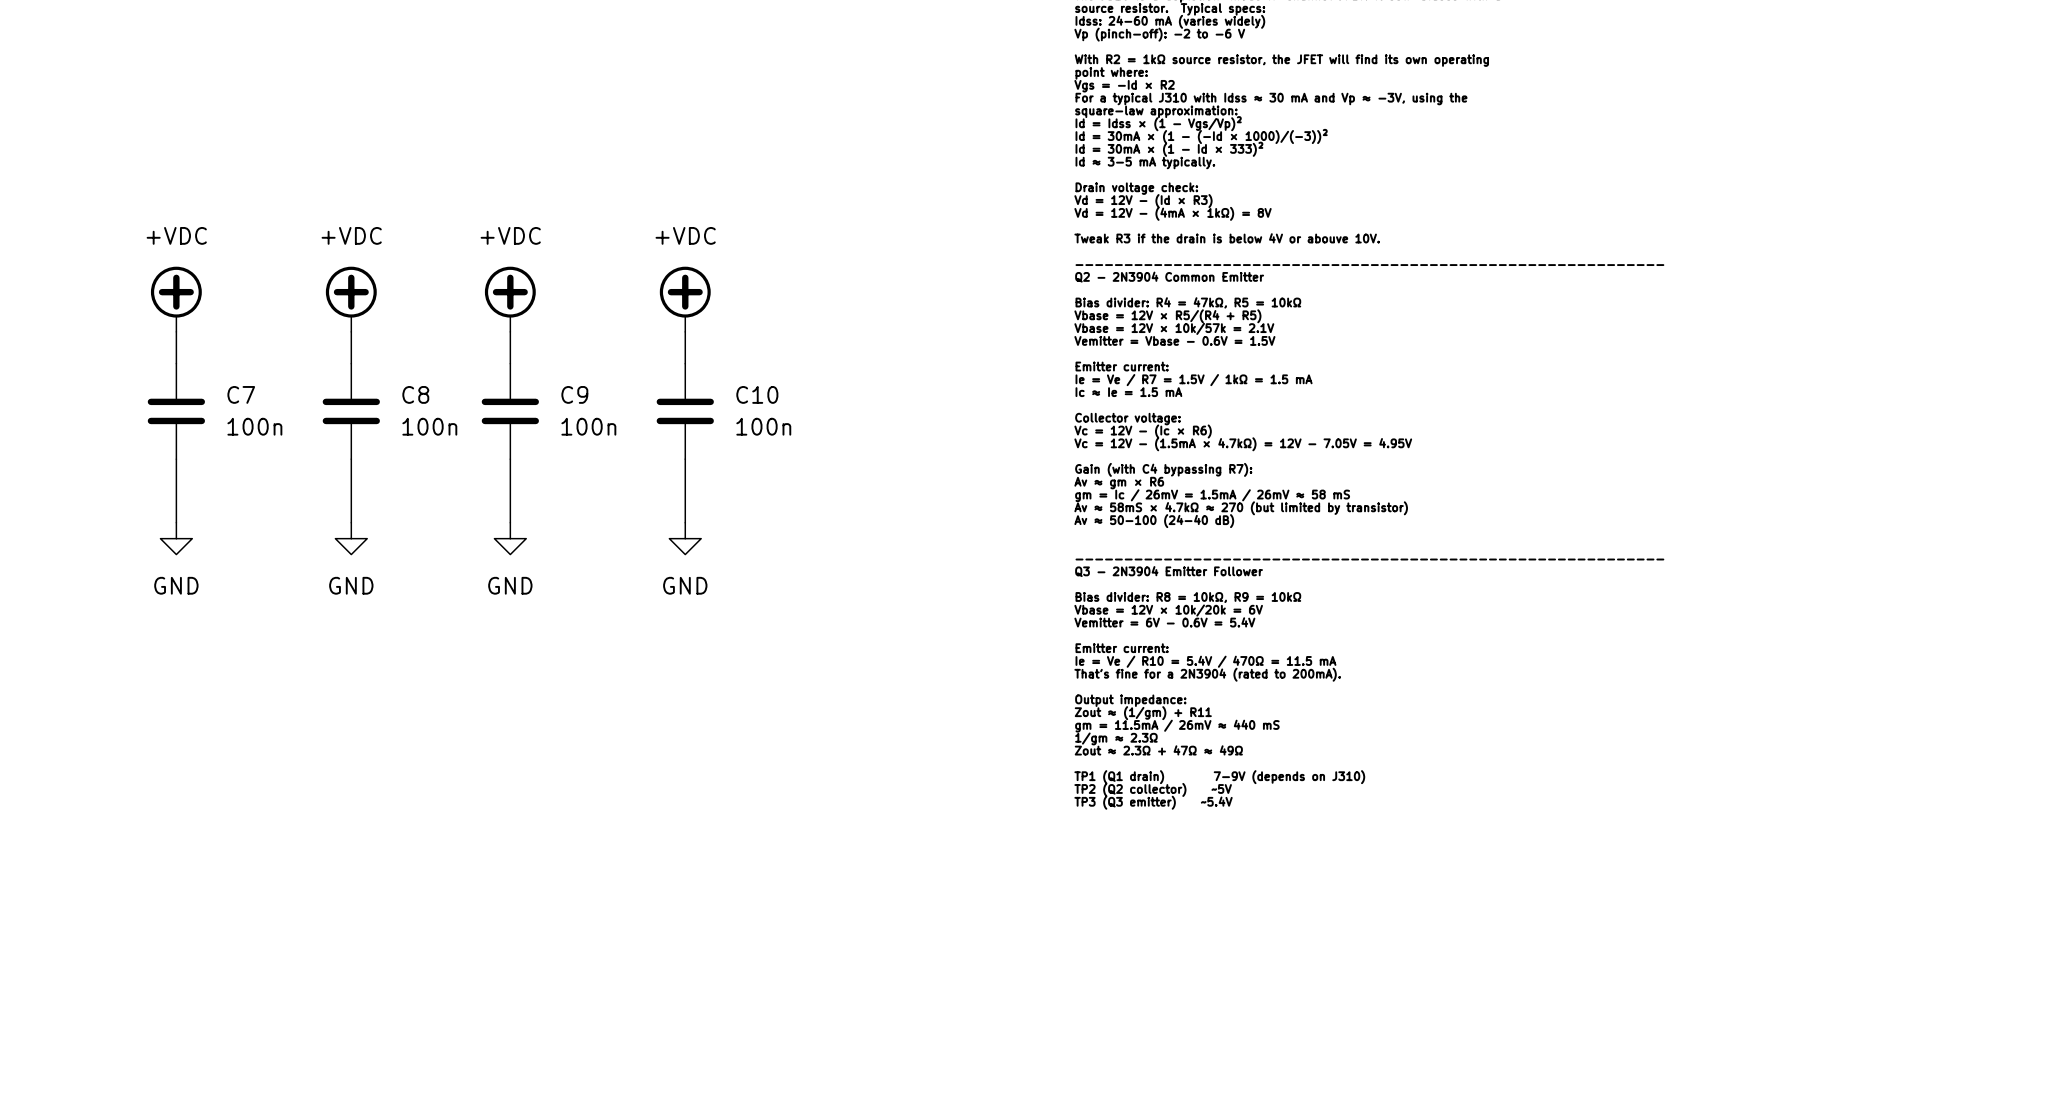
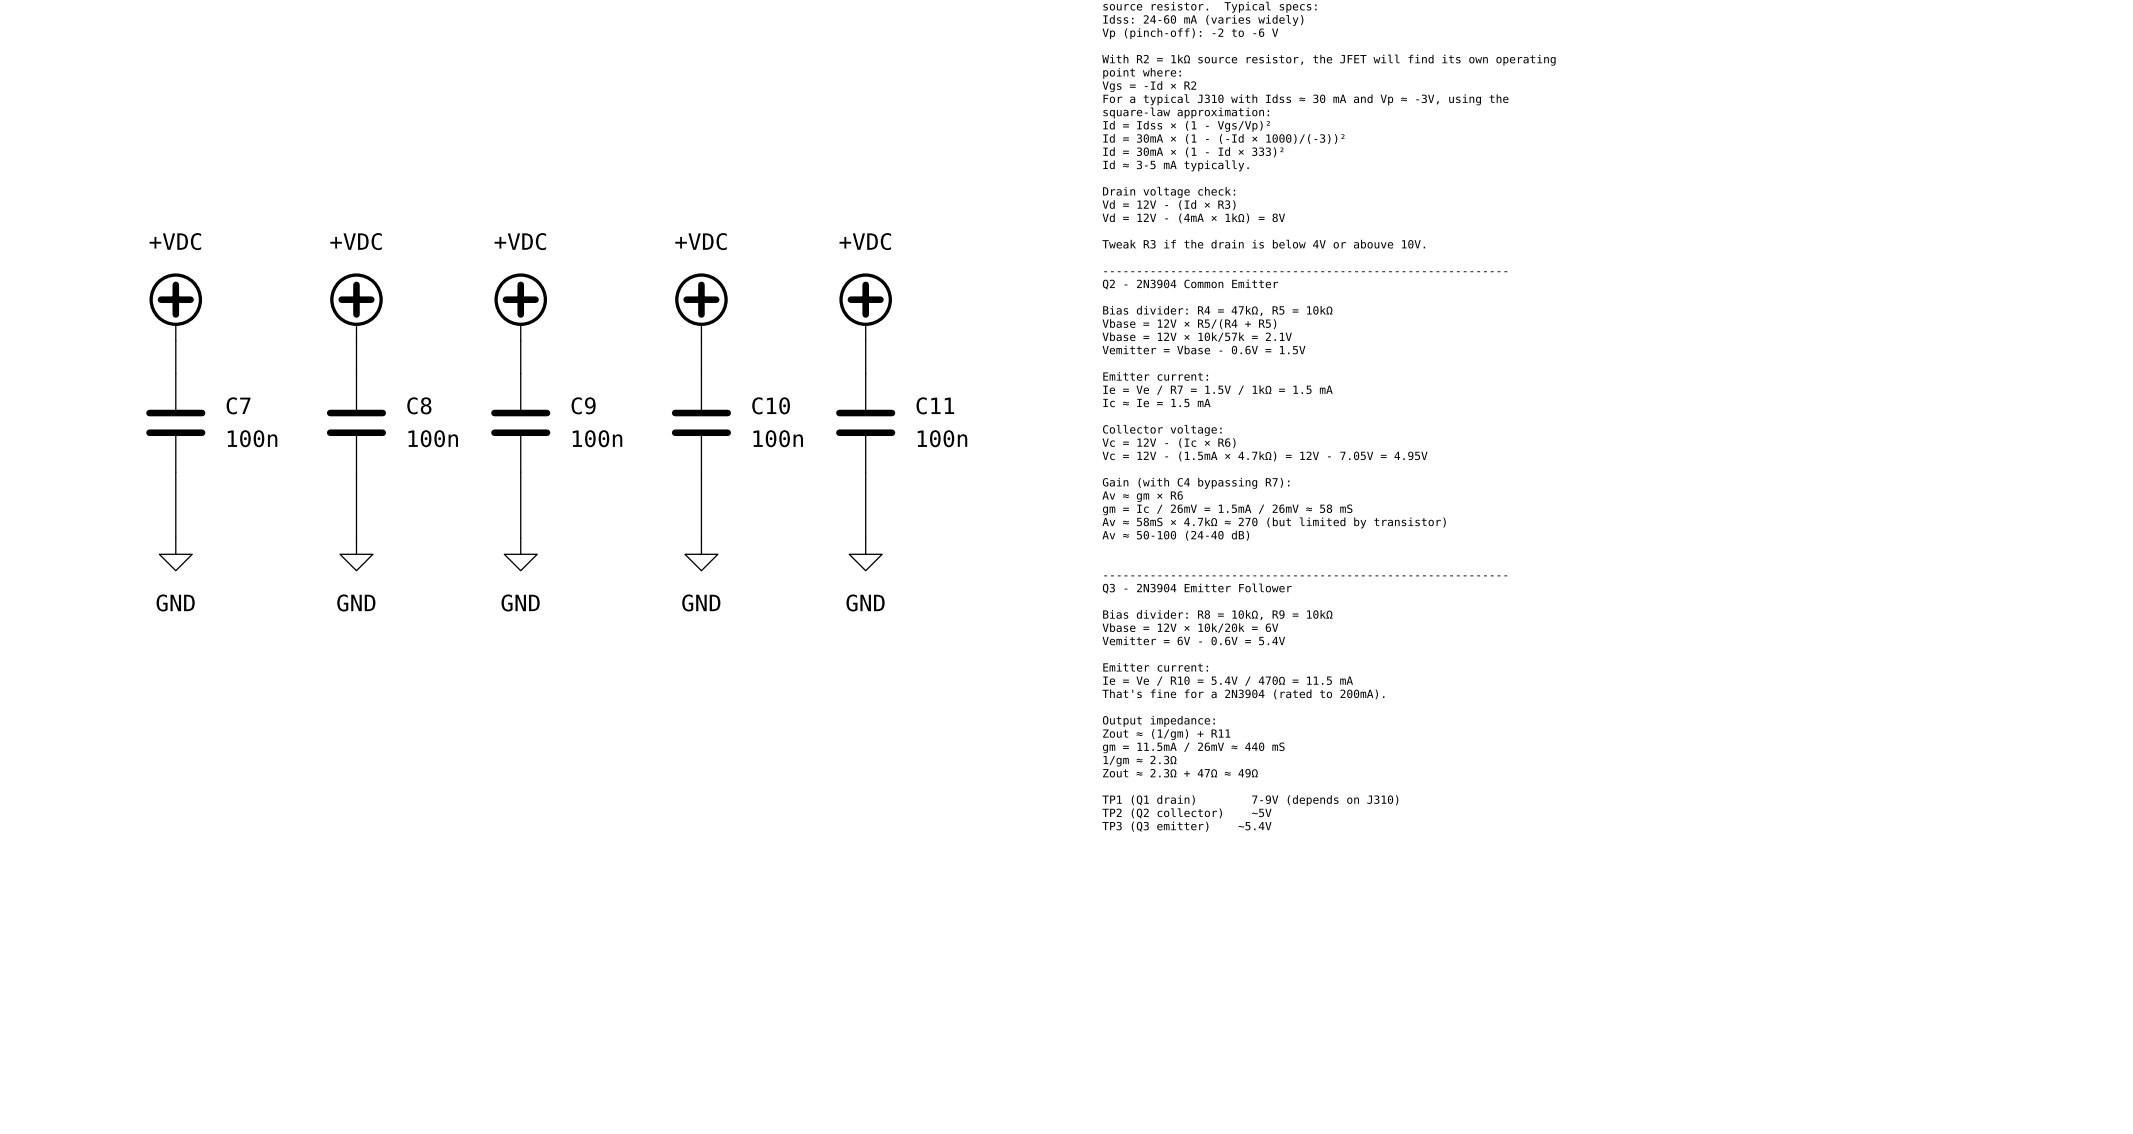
power symbol: none -> +VDC (865, 307)
wire: none -> (865, 340) (865, 373)
C11: none -> 100n (865, 422)
wire: none -> (865, 472) (865, 537)
power symbol: none -> GND (865, 554)

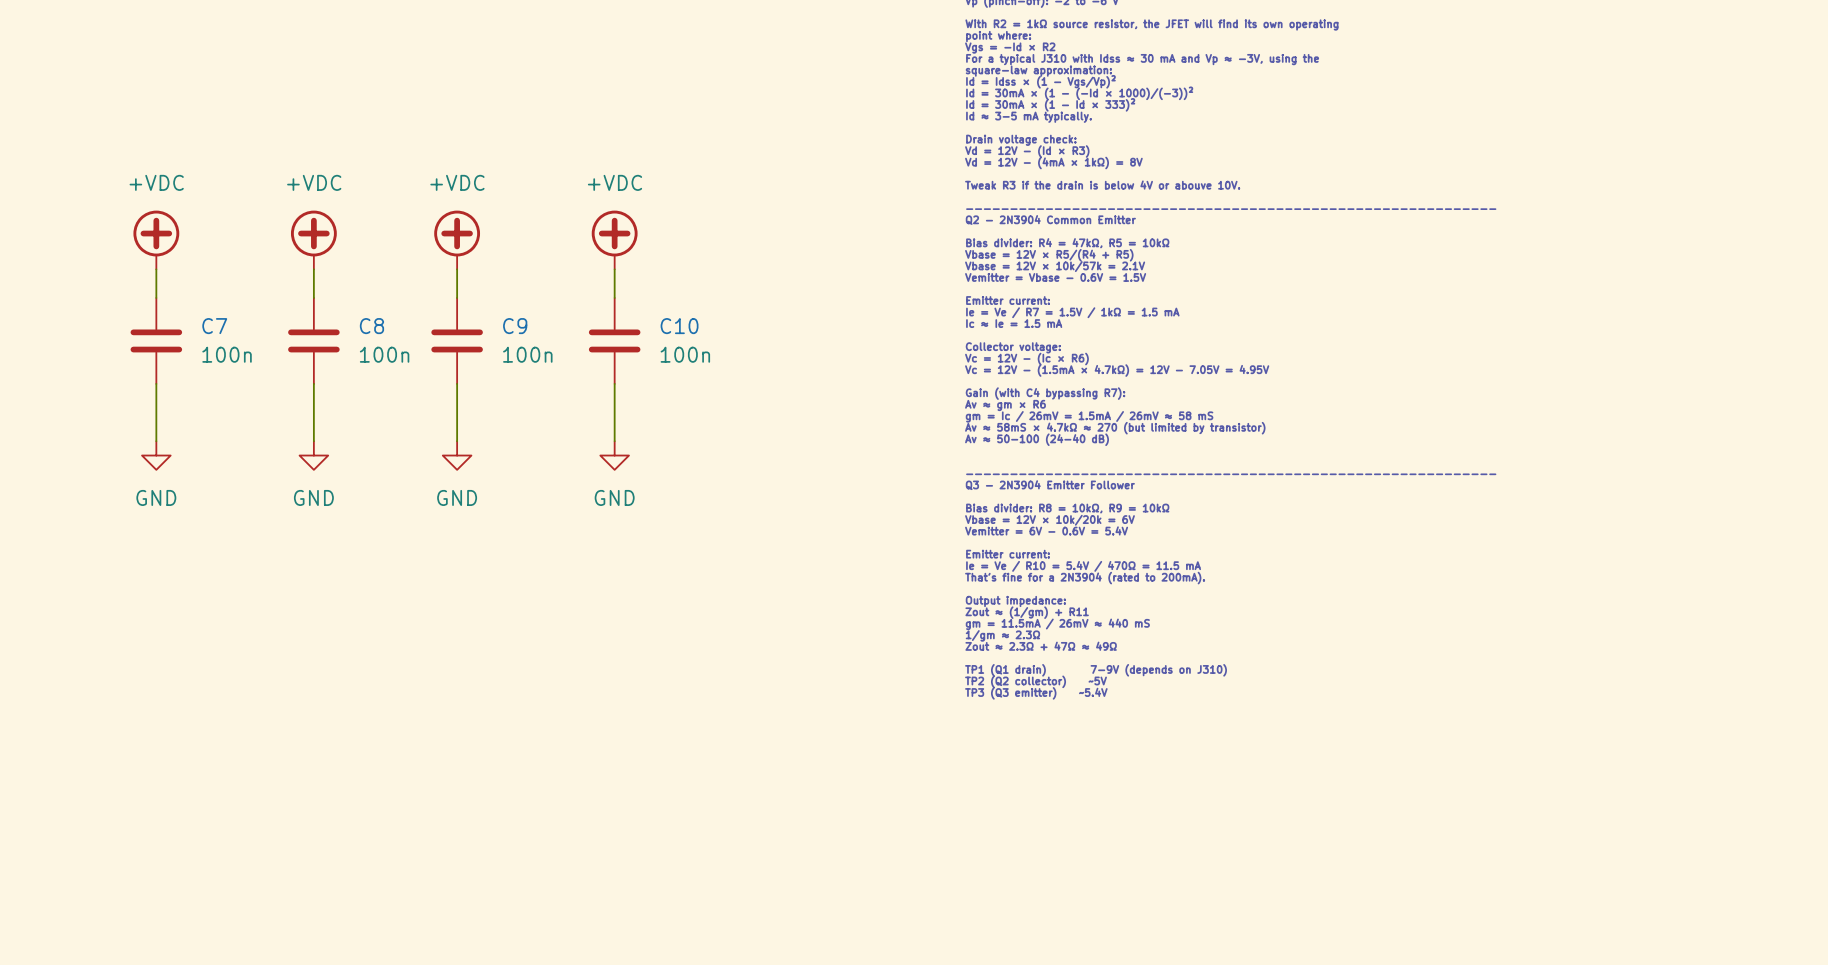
power symbol: +VDC (865, 307) -> none
wire: (865, 340) (865, 373) -> none
C11: 100n (865, 422) -> none
wire: (865, 472) (865, 537) -> none
power symbol: GND (865, 554) -> none

